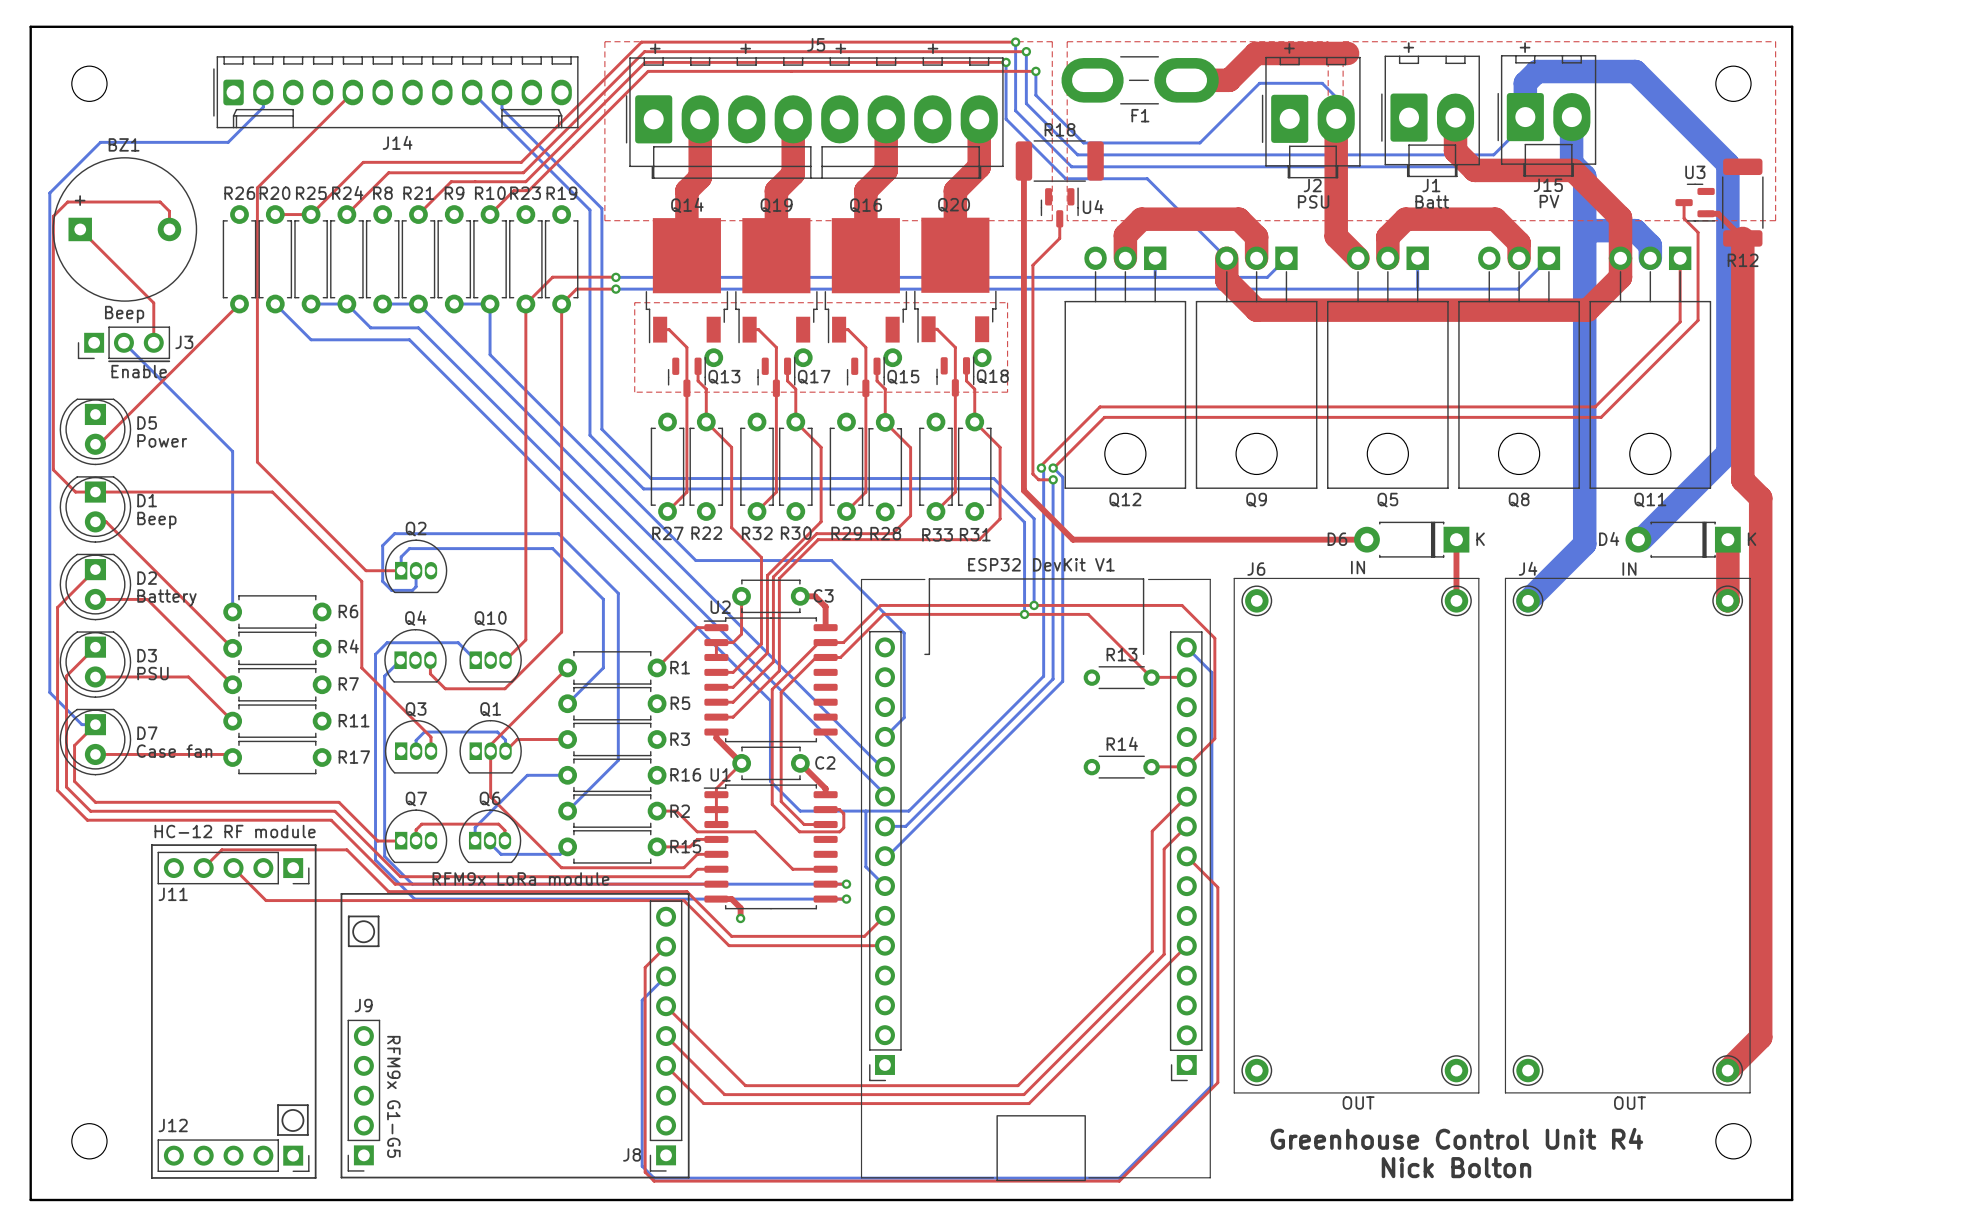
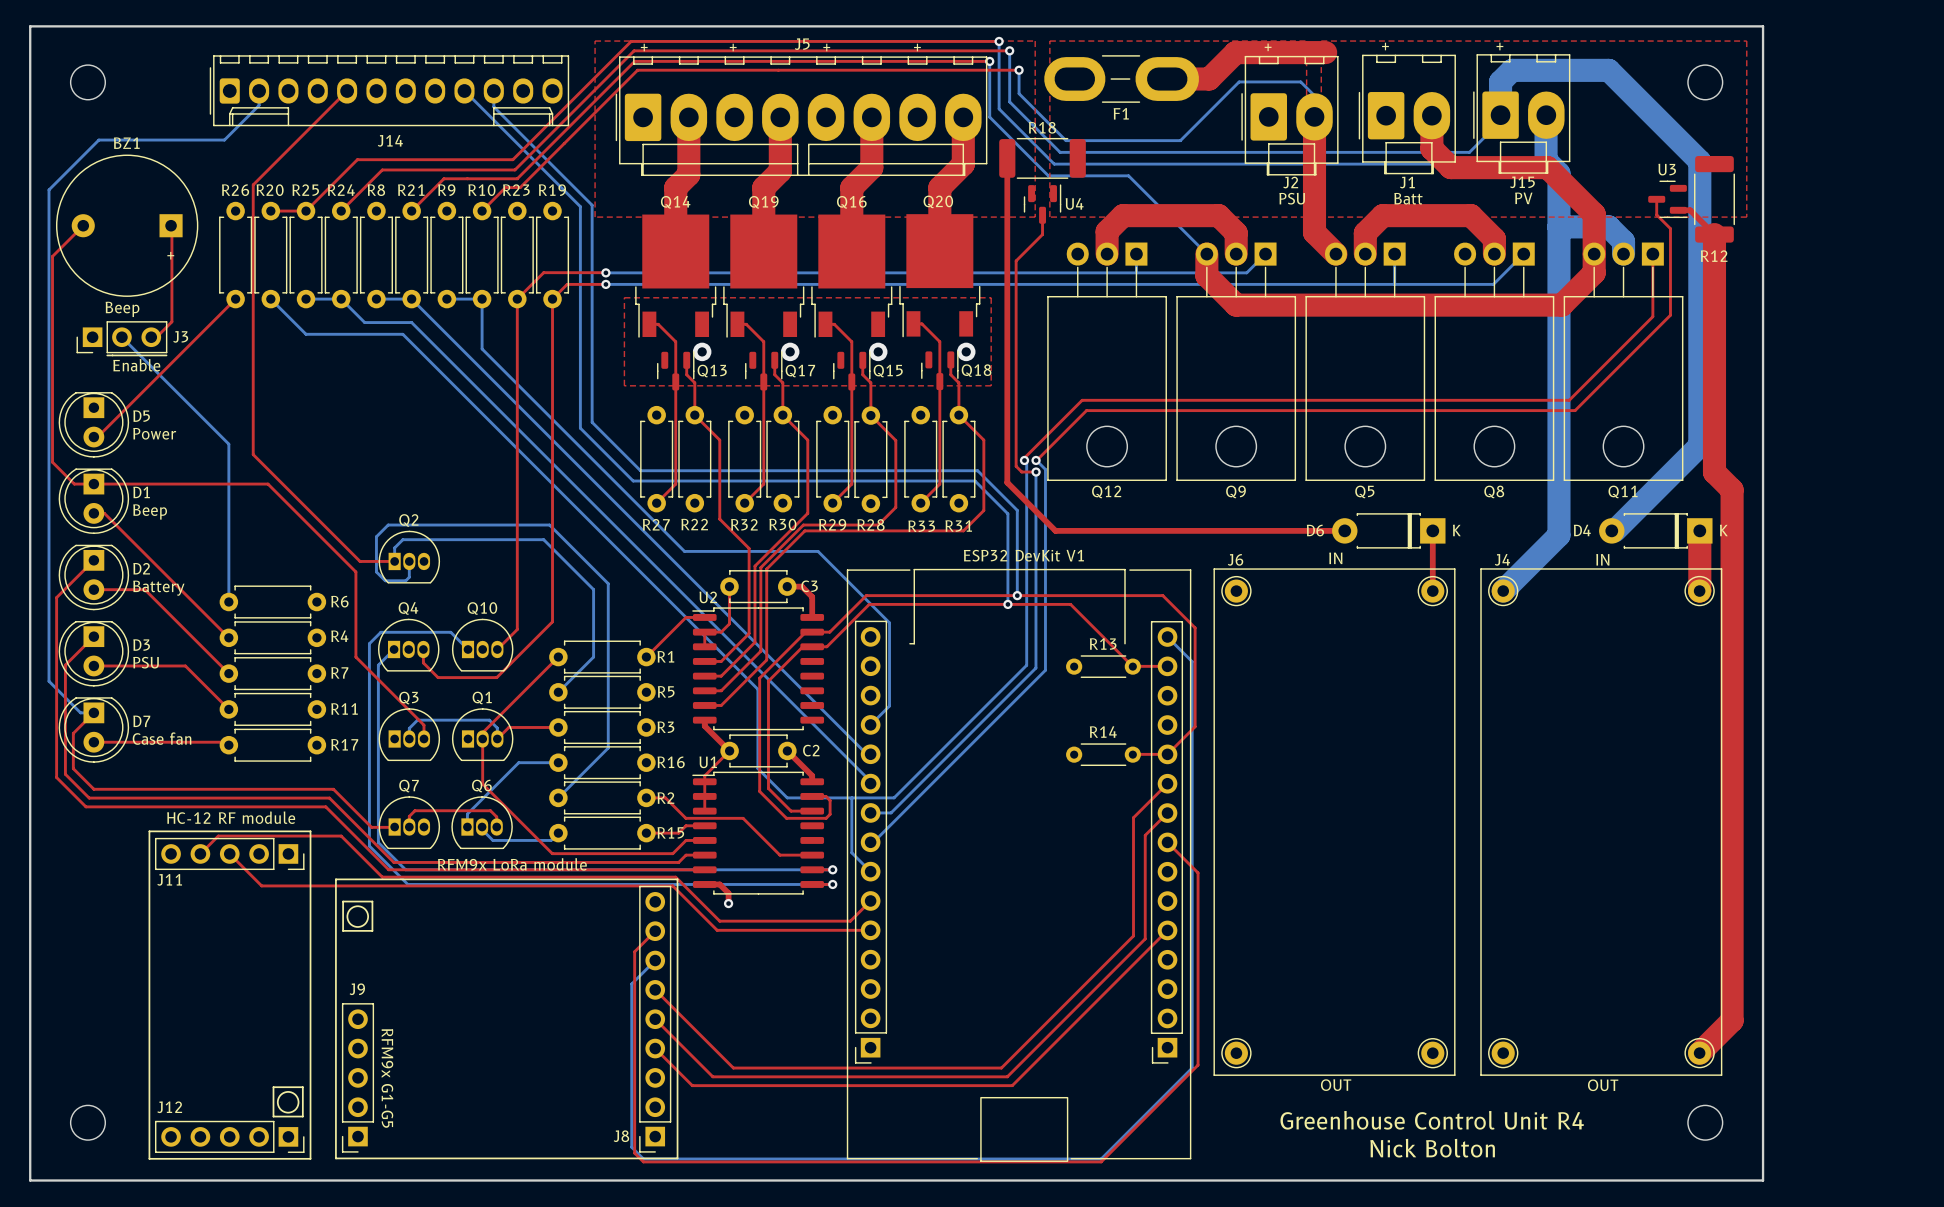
top track: (80, 229) (153, 303) (153, 342) -> none
BZ1 rotation: 0° (124, 229) -> 180° (127, 225)
top track: (169, 229) (169, 211) (160, 202) (67, 202) (53, 216) (53, 260) -> (83, 225) (52, 256)
top track: none -> (171, 225) (171, 321) (156, 337)

